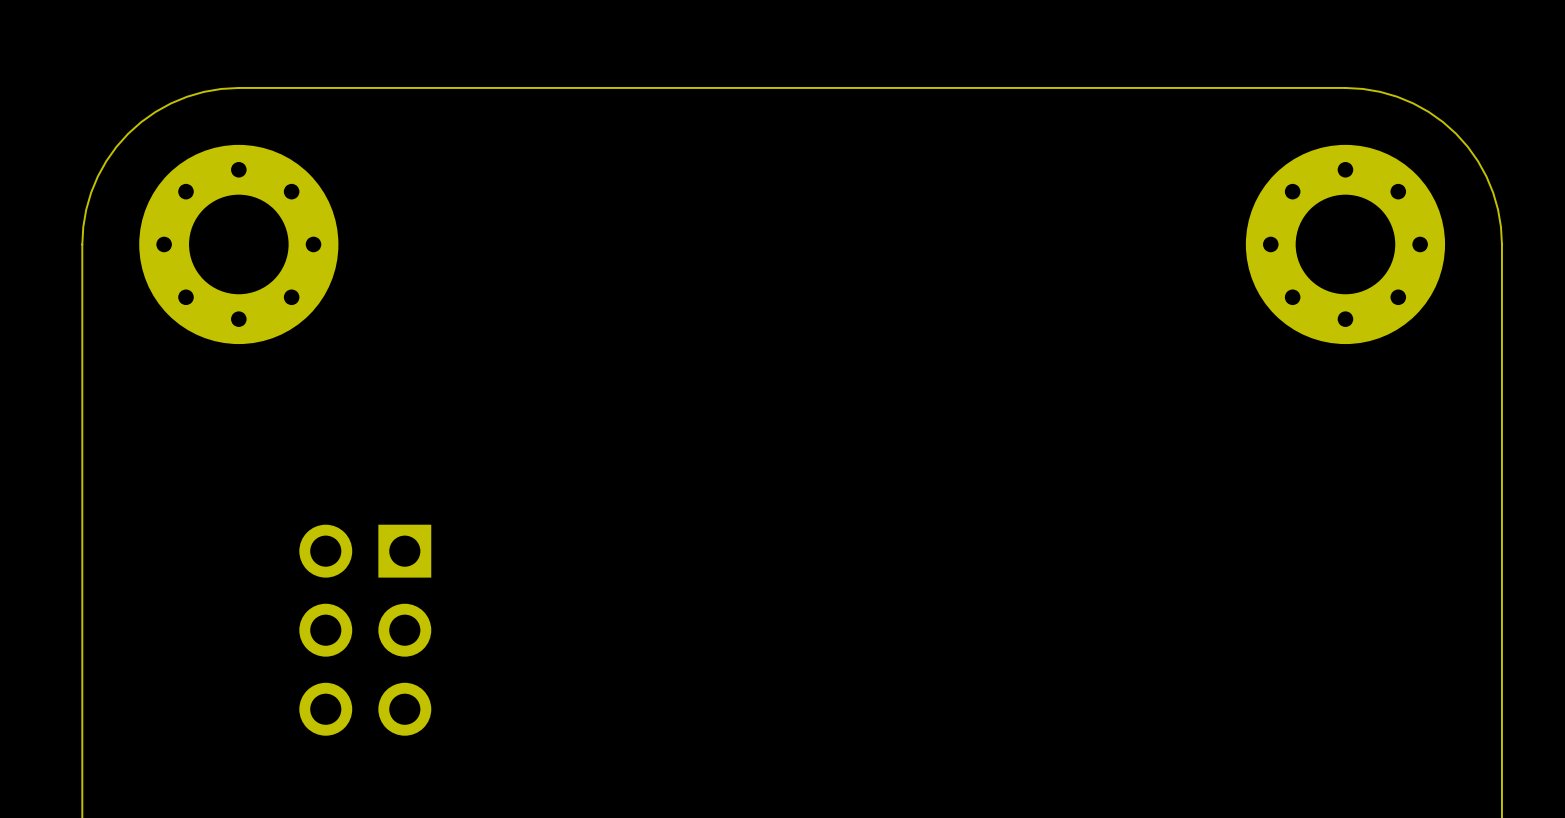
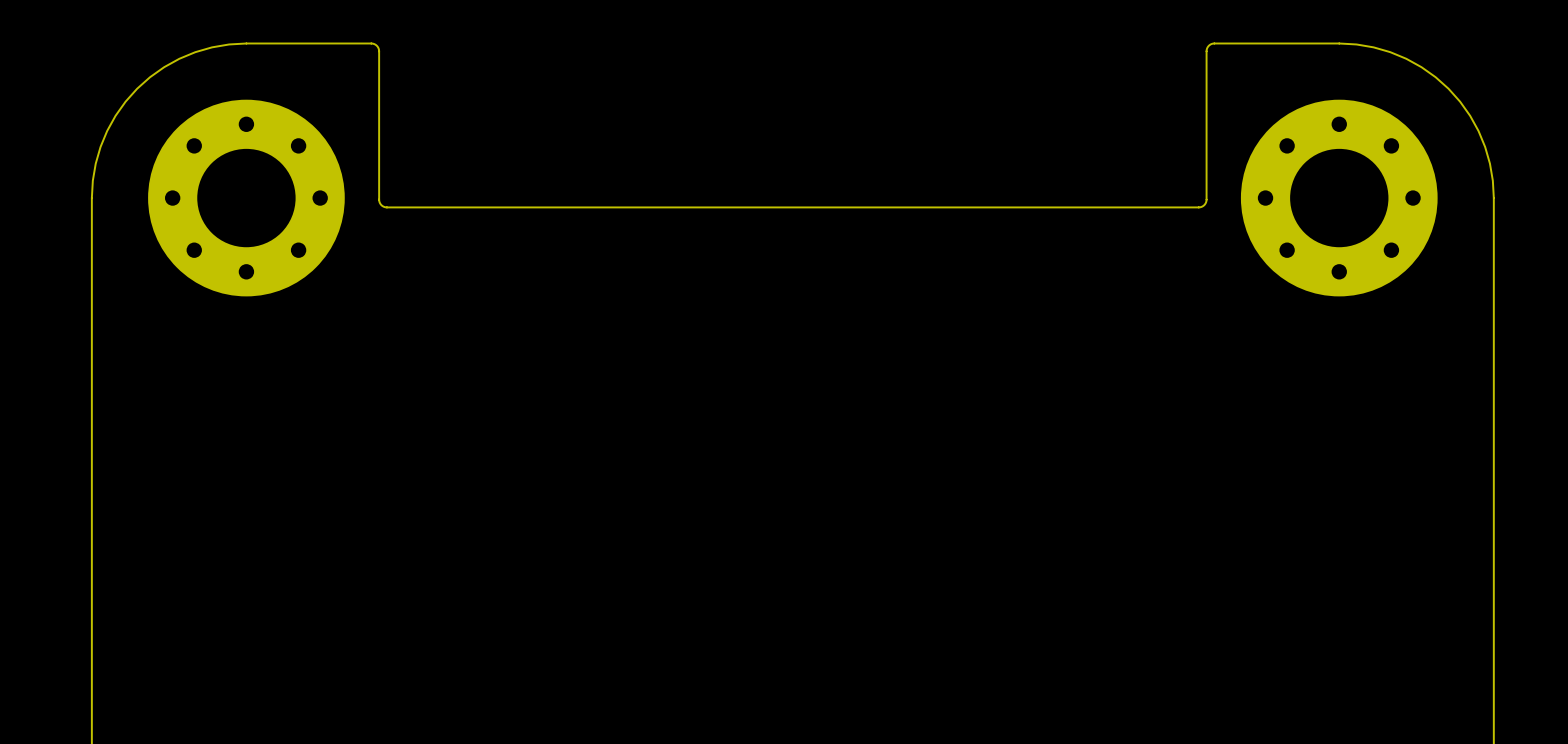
board edge: (1218, 87) (365, 87) -> (1214, 43) (1208, 45) (1206, 51) (1206, 200) (1204, 205) (1198, 207) (385, 207) (381, 205) (379, 199) (379, 50) (376, 45) (371, 43)
part: (365, 630) -> none

